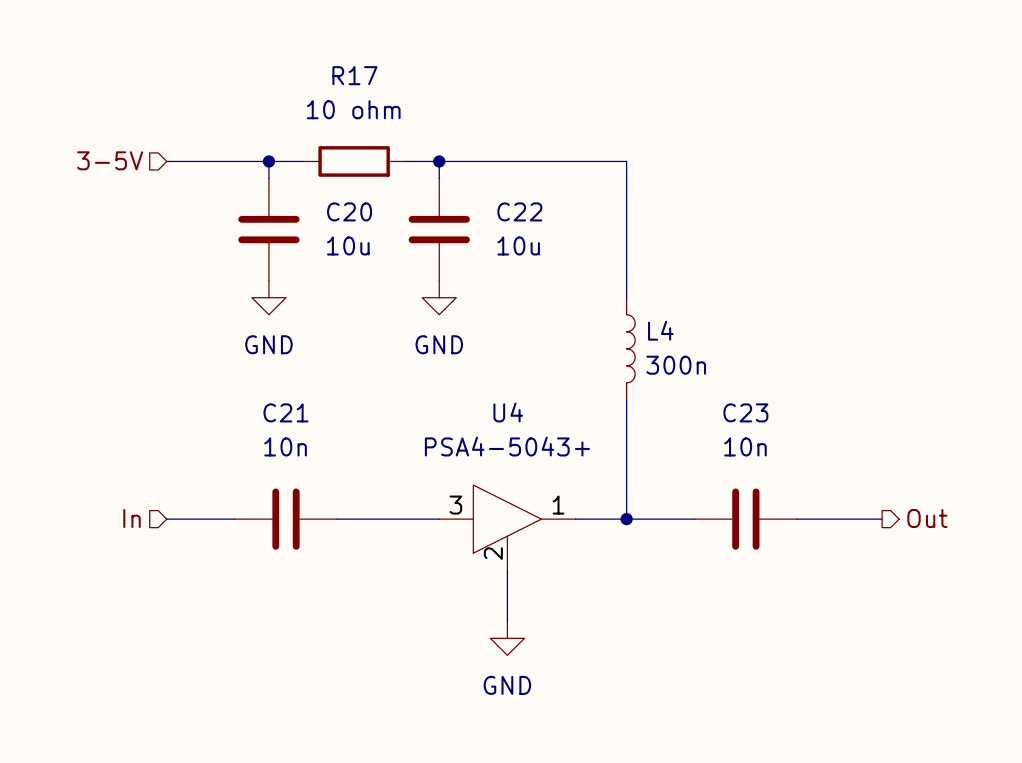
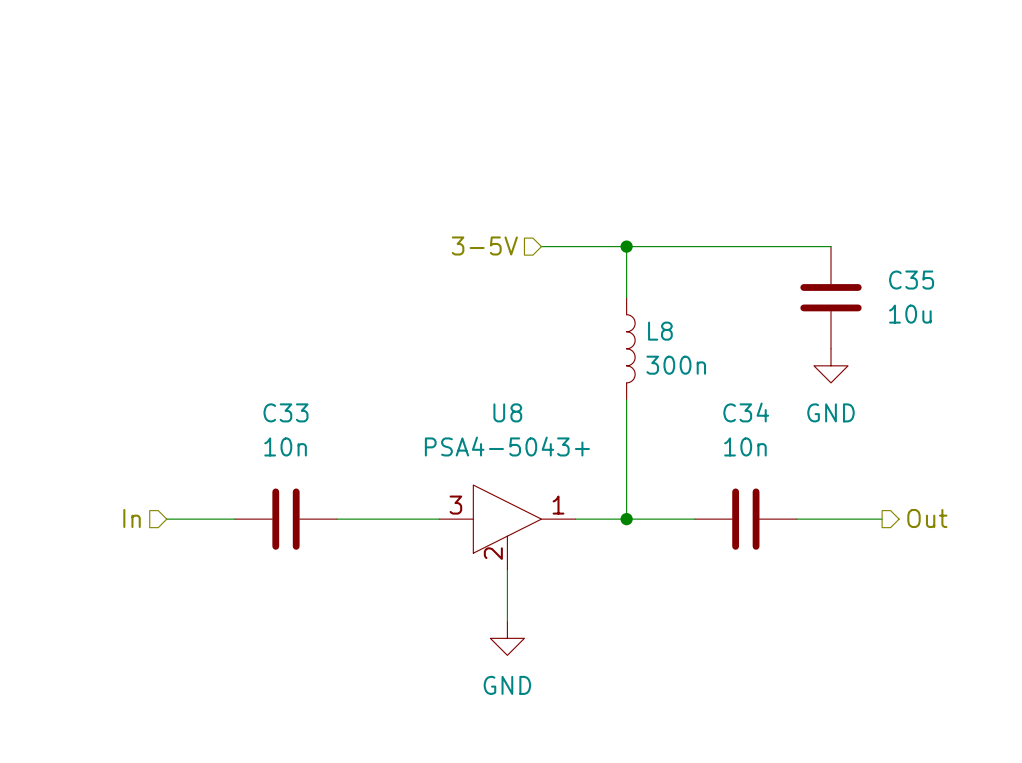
hierarchical label: 3-5V (110, 160) -> none
wire: (166, 161) (303, 161) -> none
wire: (268, 161) (268, 178) -> none
junction: (268, 161) -> none
R17: 10 ohm (354, 161) -> none
wire: (405, 161) (626, 161) (626, 246) -> none
wire: (439, 161) (439, 178) -> none
junction: (439, 161) -> none
C20: 10u (268, 229) -> none
C22: 10u (439, 229) -> none
hierarchical label: none -> 3-5V (484, 245)
wire: none -> (541, 246) (831, 246)
junction: none -> (626, 246)
power symbol: GND (268, 297) -> none
power symbol: GND (439, 297) -> none
C35: none -> 10u (831, 297)
L4 name: L4 (660, 330) -> L8 (660, 331)
power symbol: none -> GND (831, 365)
C21 name: C21 (285, 412) -> C33 (285, 412)
U4 name: U4 (508, 412) -> U8 (507, 412)
C23 name: C23 (745, 412) -> C34 (746, 412)

